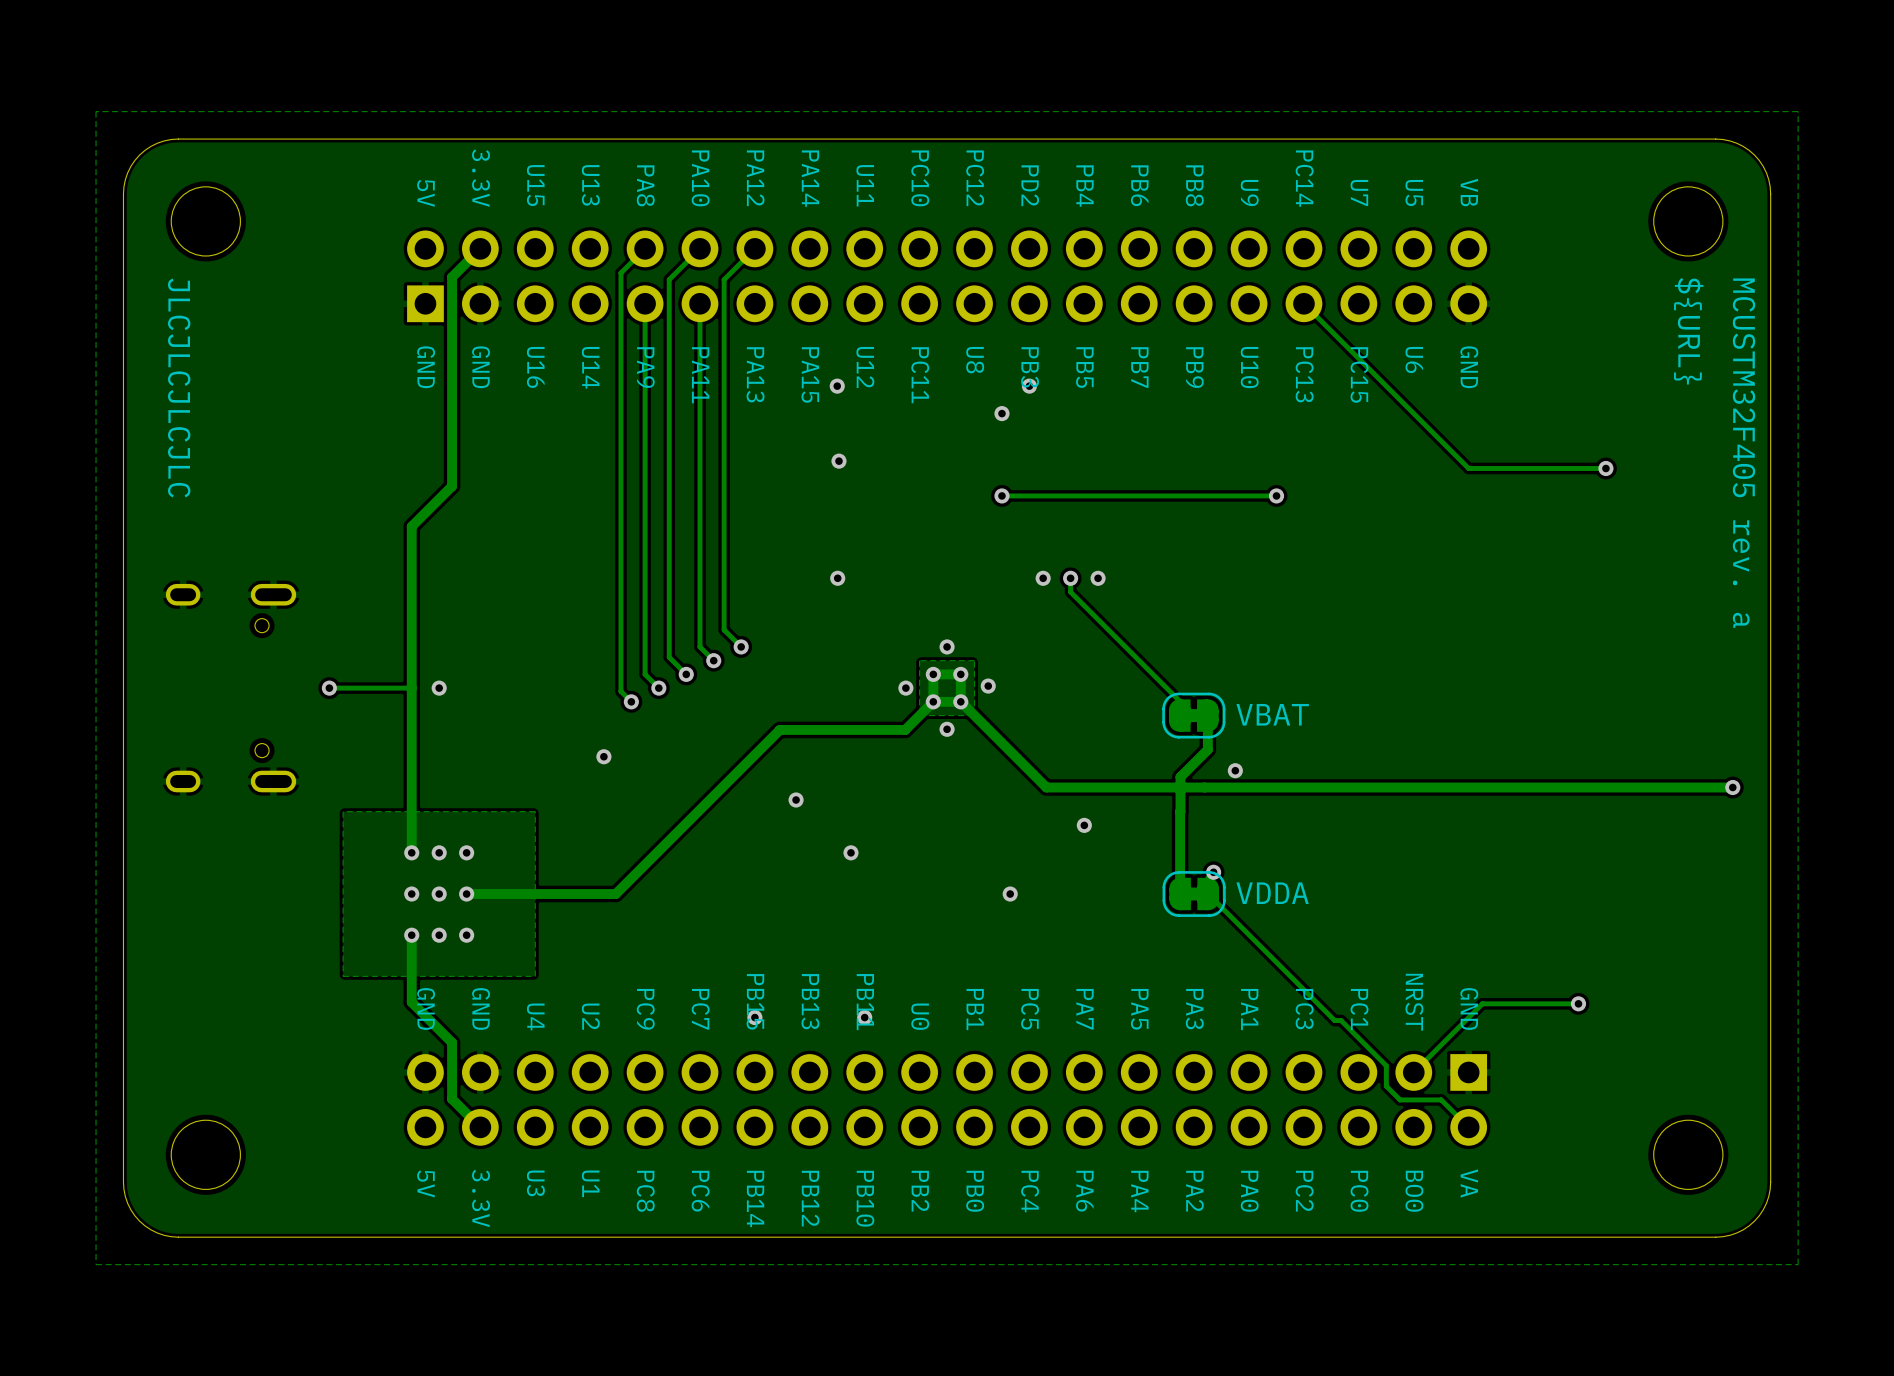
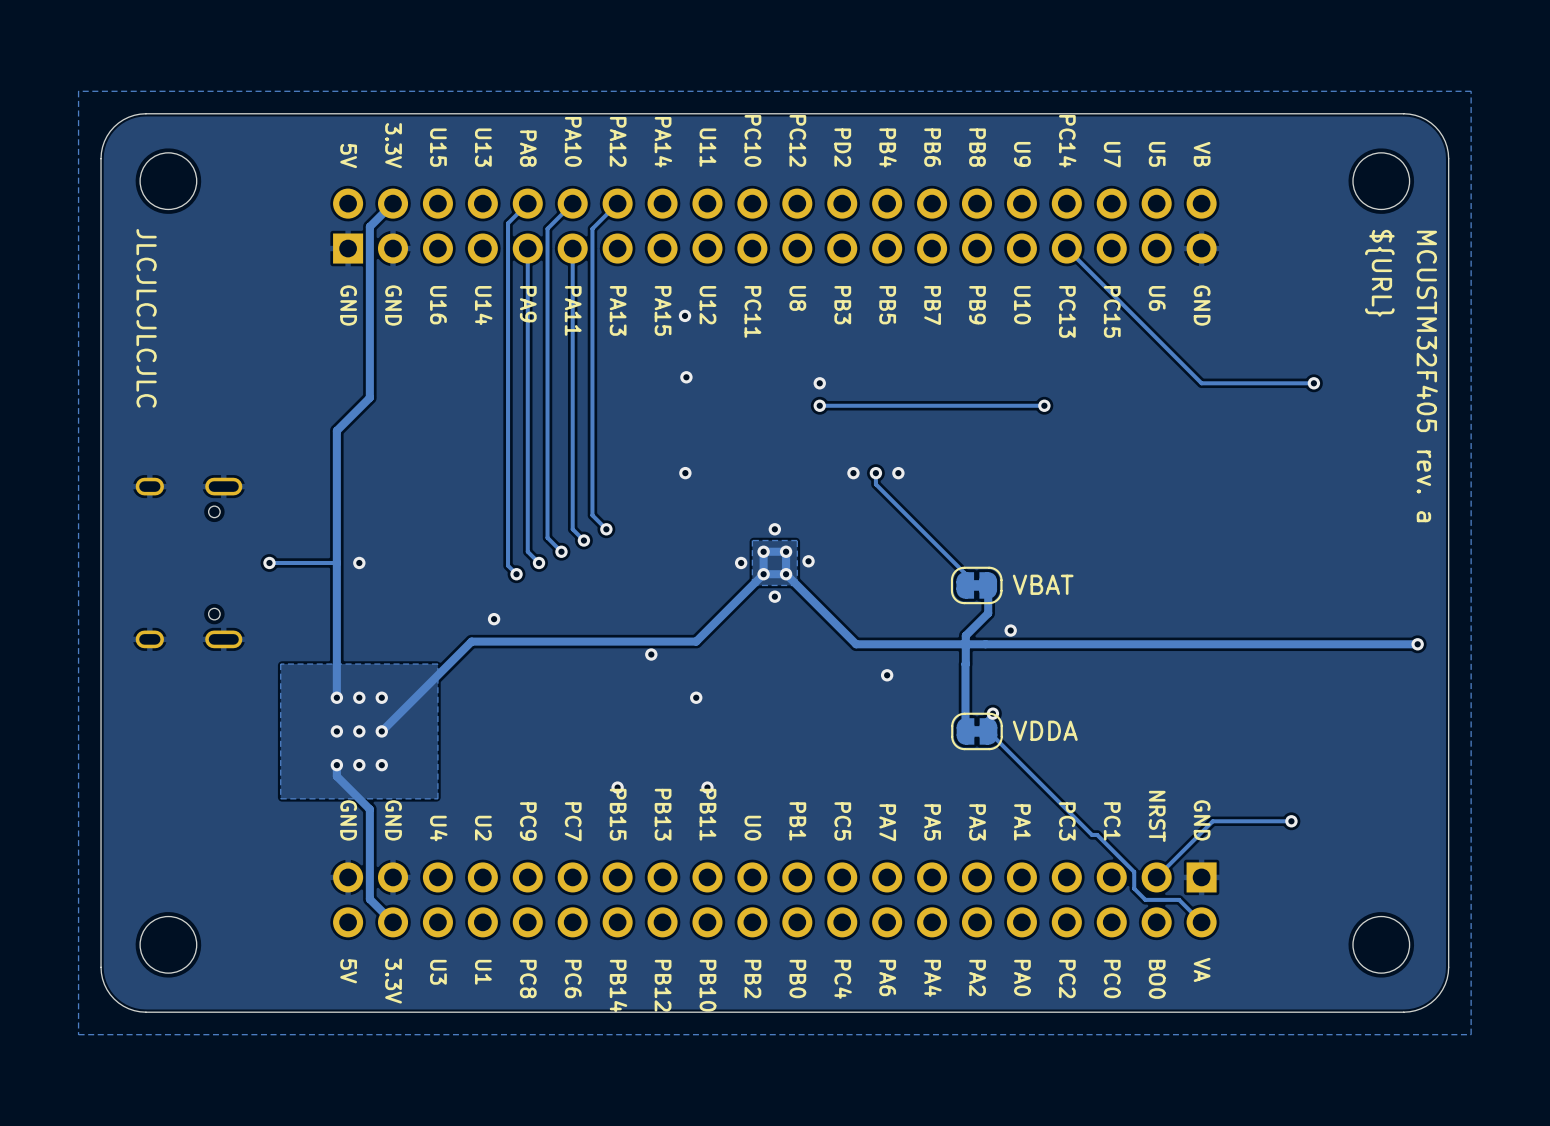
via: (1029, 386) -> none
via: (1001, 413) -> none
via: none -> (819, 383)
track: (905, 729) (779, 729) (615, 894) (466, 894) -> (740, 597) (696, 641) (471, 641) (381, 731)
via: (1010, 894) -> none
track: (411, 948) (411, 1002) (452, 1042) -> (336, 776) (369, 809) (369, 853)
via position: (754, 1017) -> (617, 787)
via position: (864, 1017) -> (707, 787)

